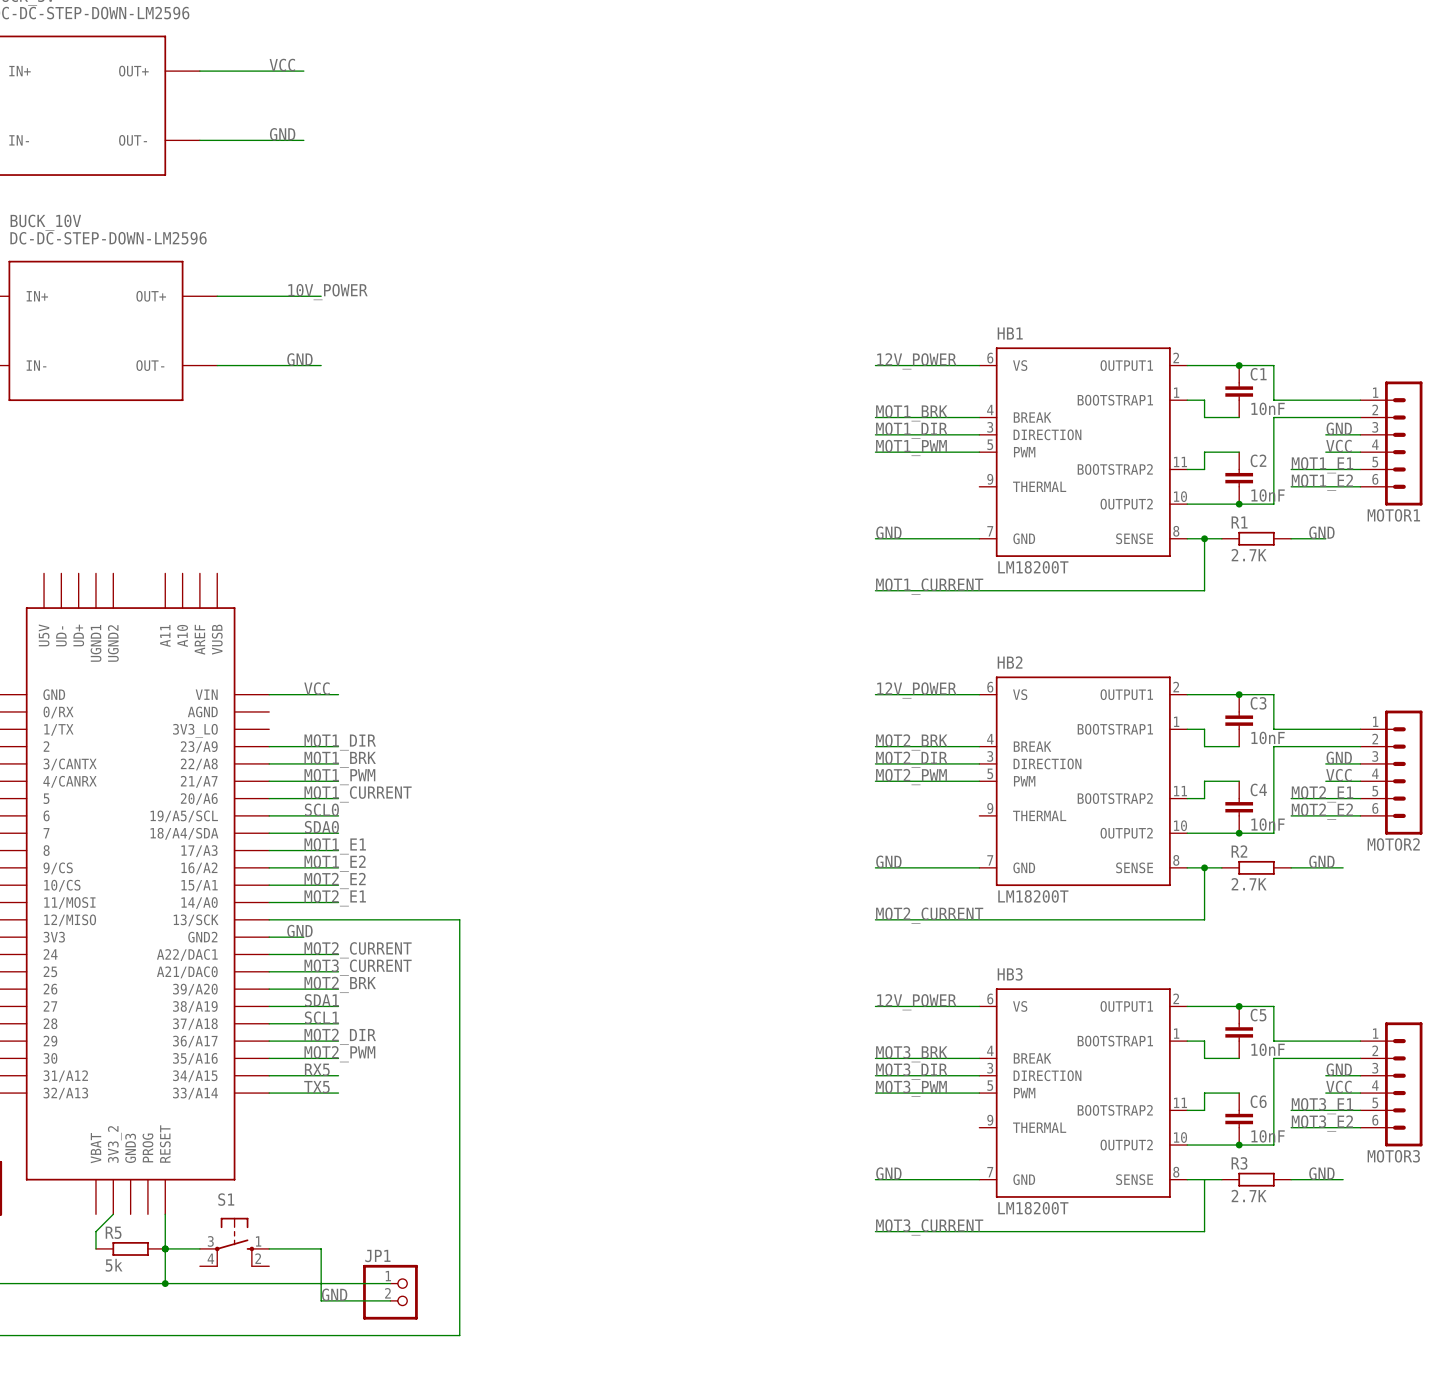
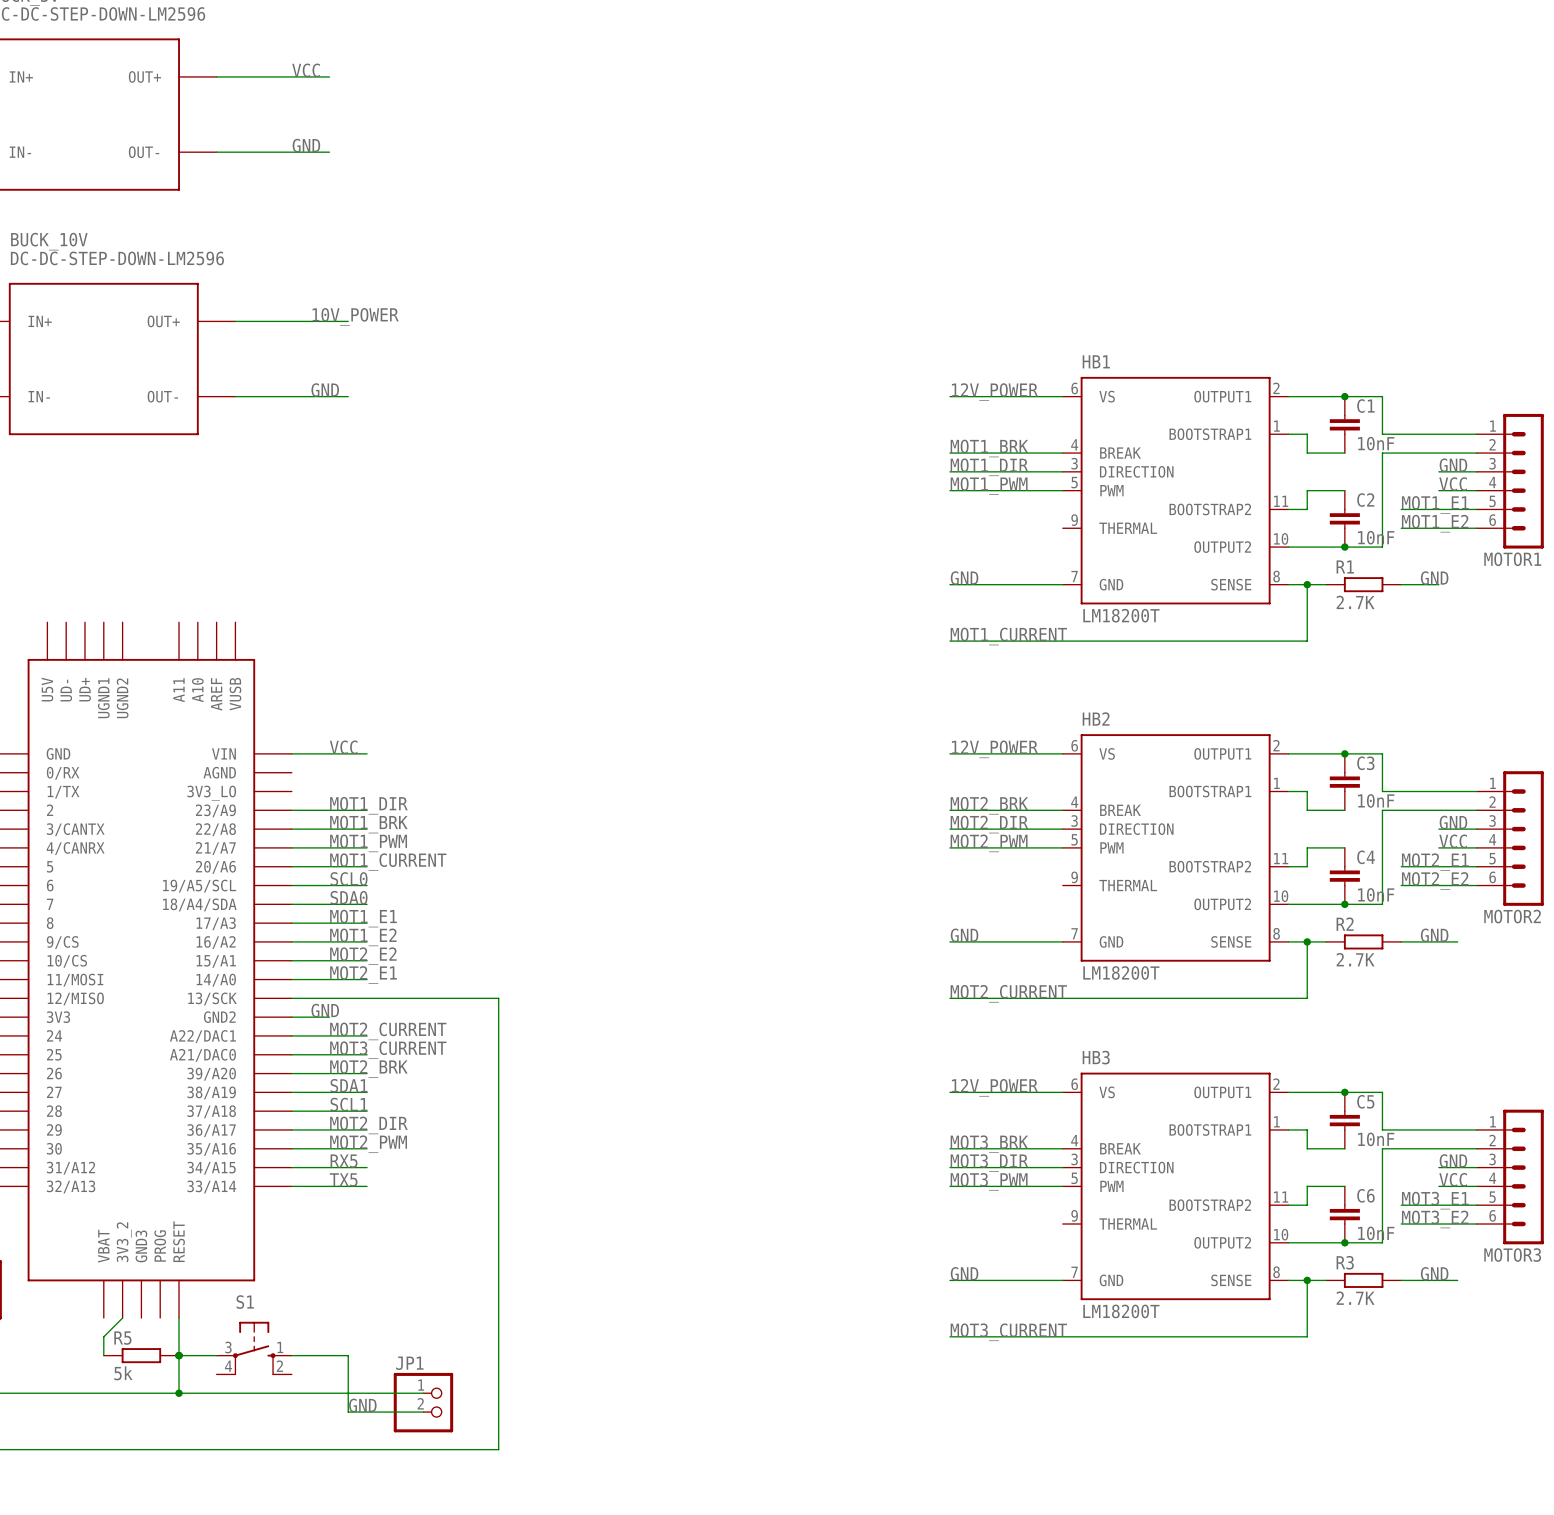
junction: none -> (1307, 1280)

